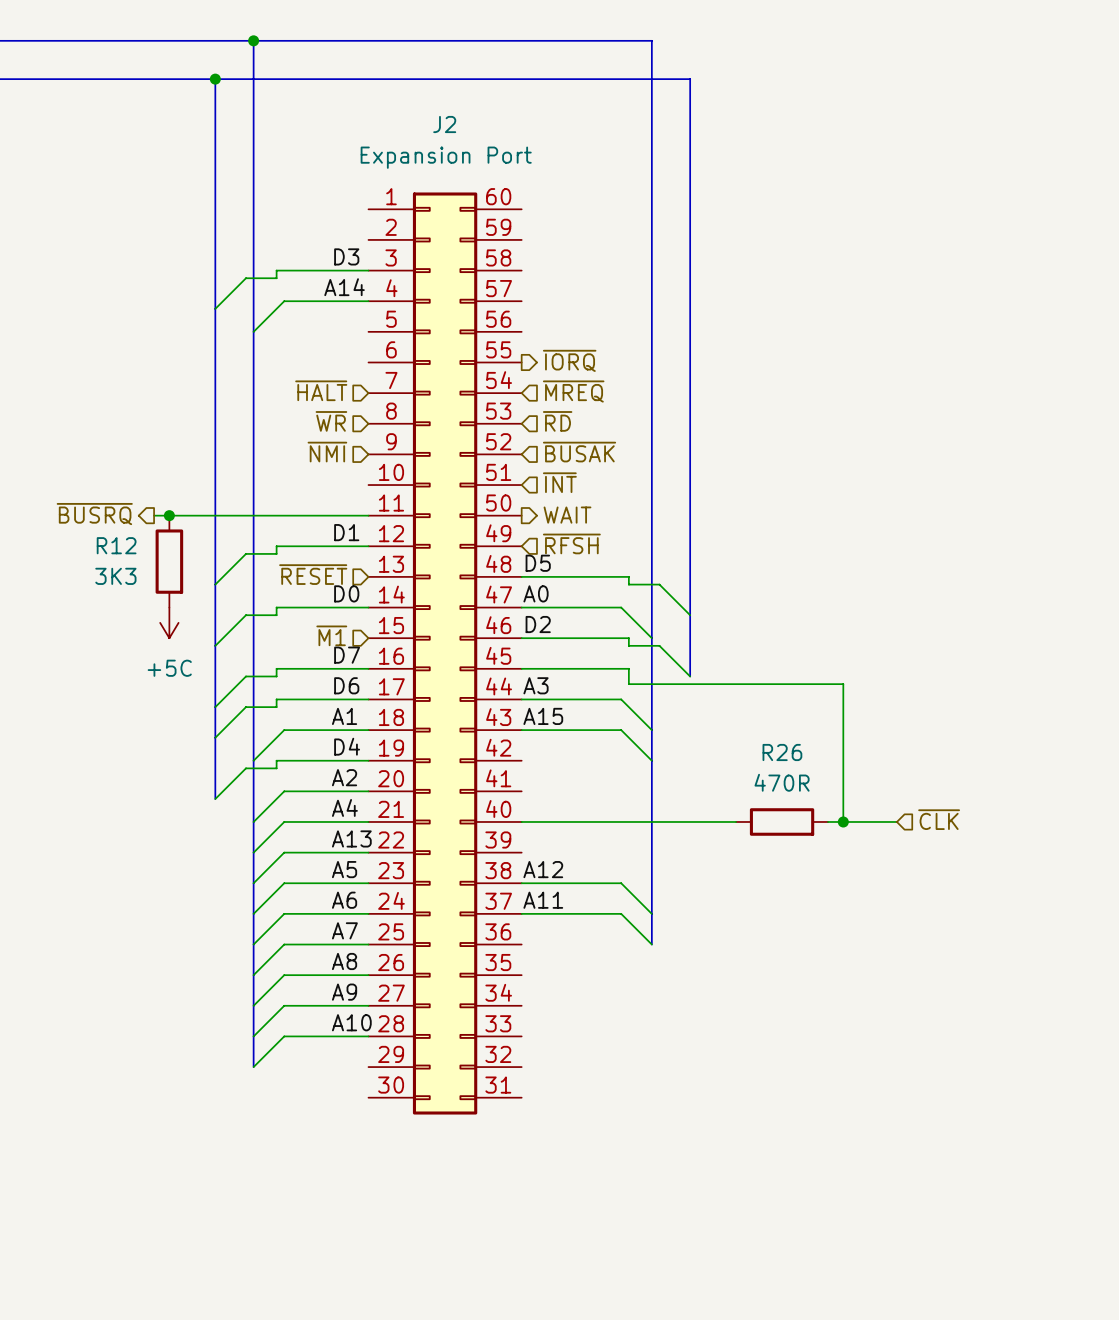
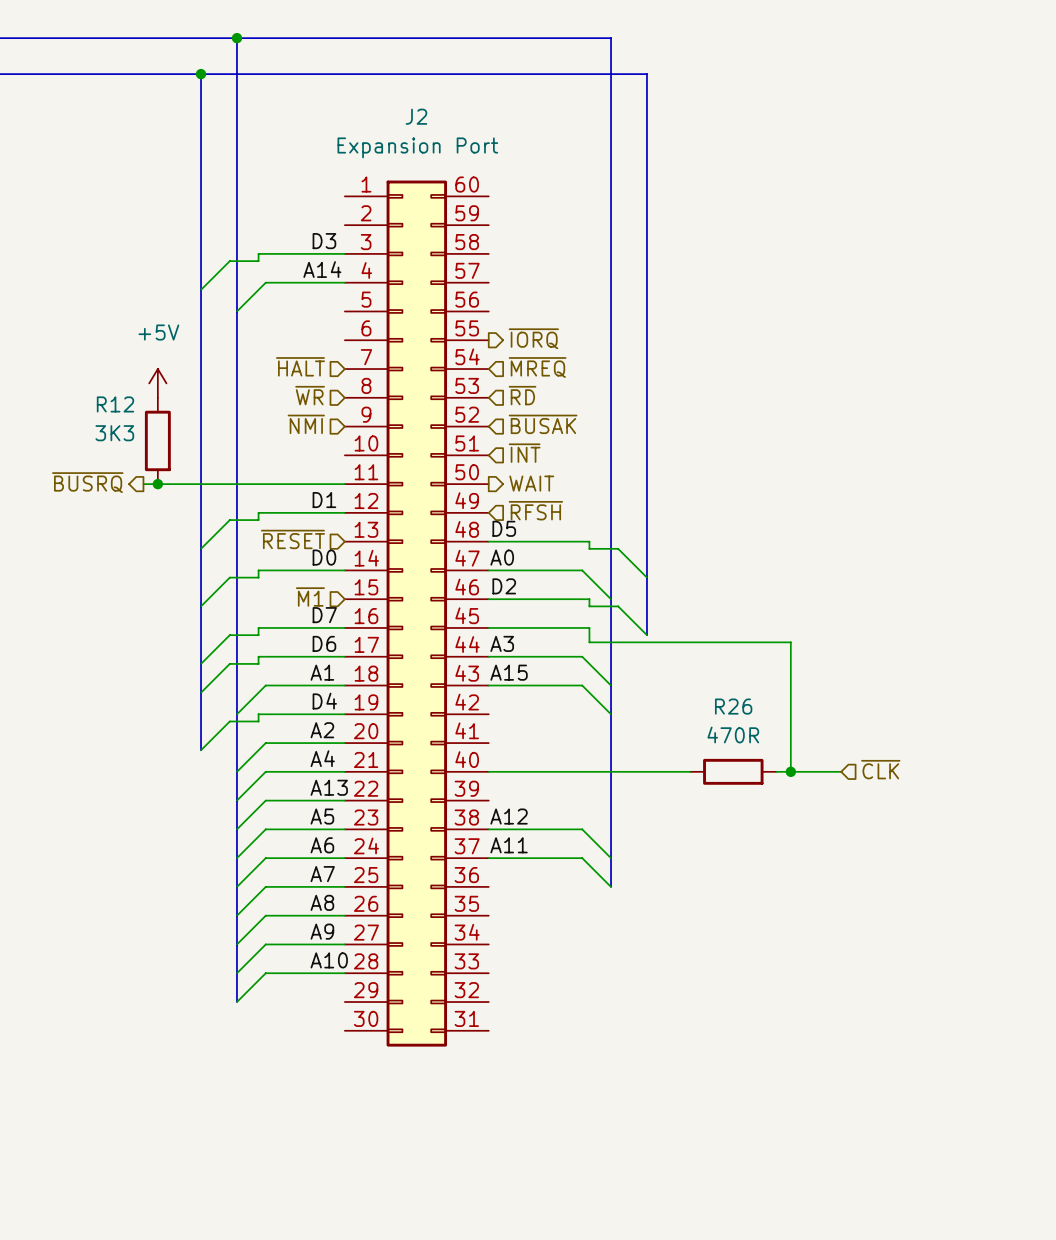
power symbol: none -> +5V (157, 383)
R12 name position: R12 (116, 545) -> R12 (115, 404)
R12 position: (169, 561) -> (157, 440)
R12 value position: 3K3 (115, 576) -> 3K3 (114, 433)
power symbol: +5C (169, 622) -> none

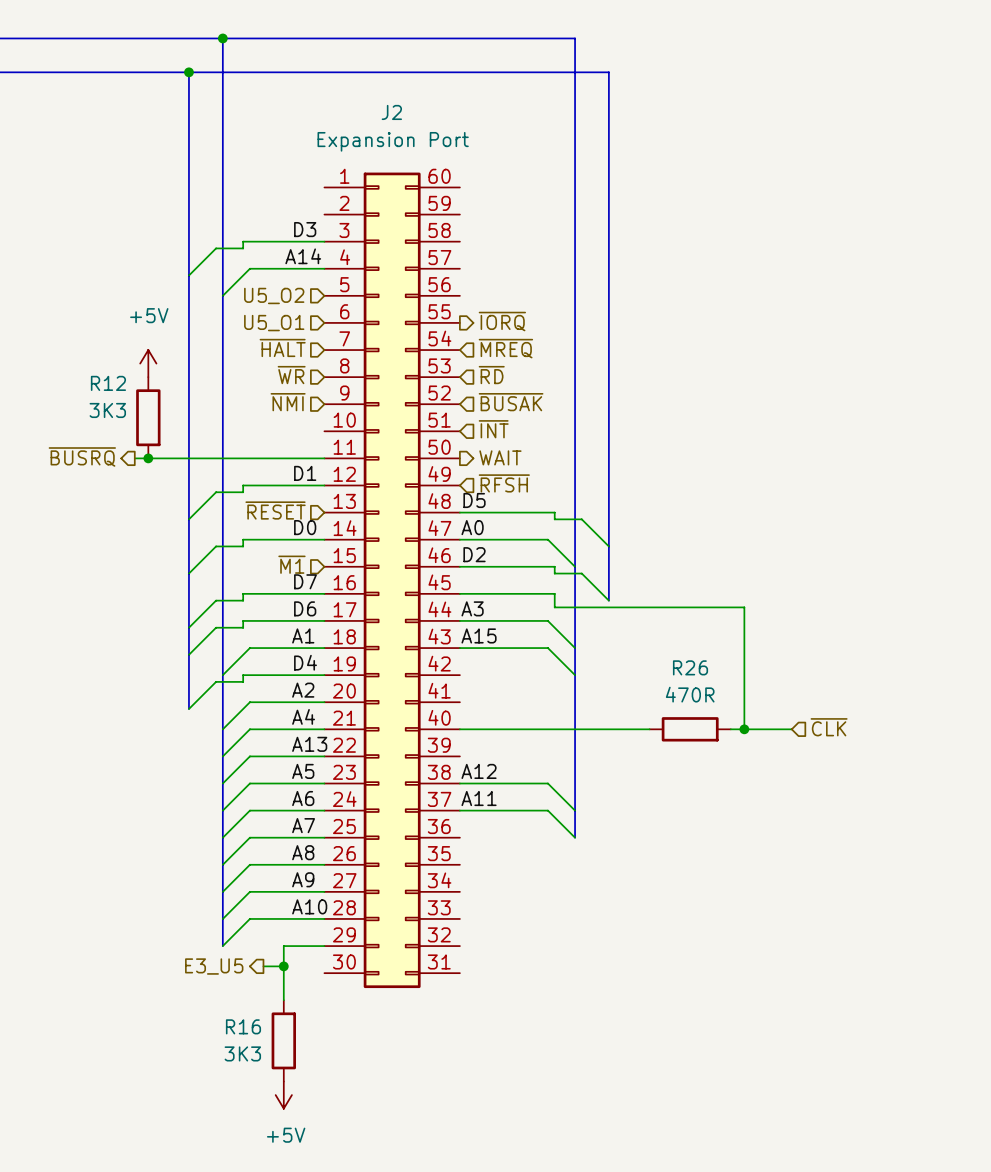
hierarchical label: none -> U5_O2 (274, 295)
hierarchical label: none -> U5_O1 (274, 323)
wire: none -> (324, 946) (283, 946) (283, 1000)
hierarchical label: none -> E3_U5 (214, 966)
wire: none -> (263, 966) (283, 966)
junction: none -> (283, 966)
R16: none -> 3K3 (283, 1040)
power symbol: none -> +5V (283, 1095)

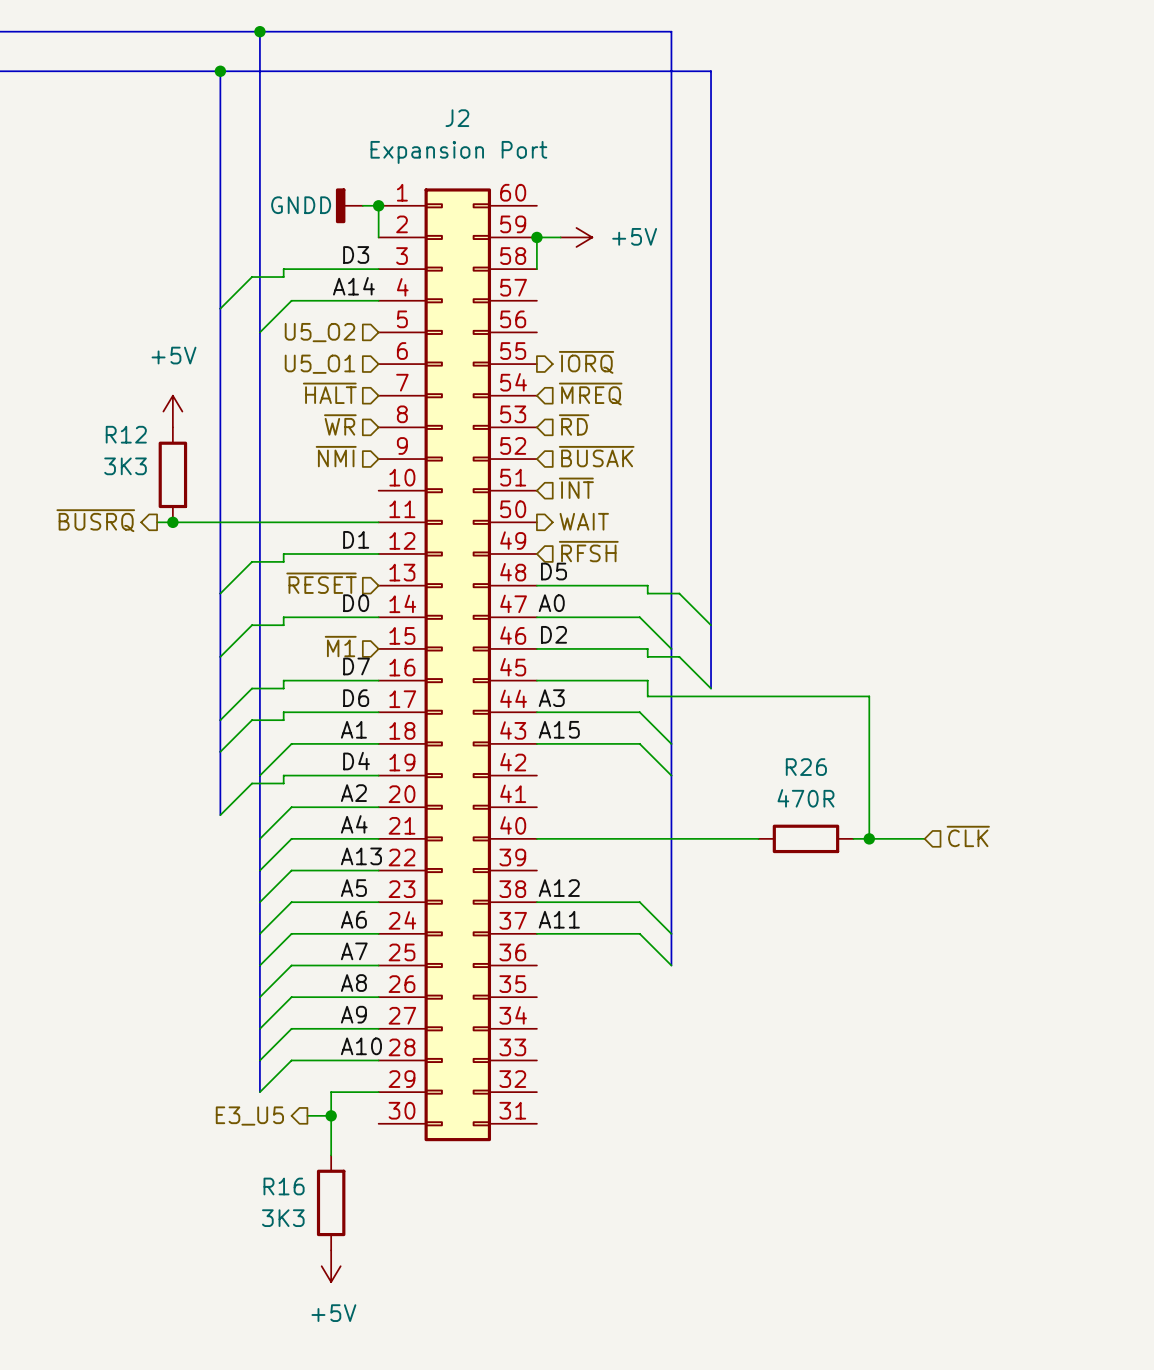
power symbol: none -> GNDD (349, 205)
wire: none -> (362, 205) (378, 205) (378, 237)
junction: none -> (378, 205)
junction: none -> (536, 237)
wire: none -> (560, 237) (536, 237) (536, 269)
power symbol: none -> +5V (576, 237)

